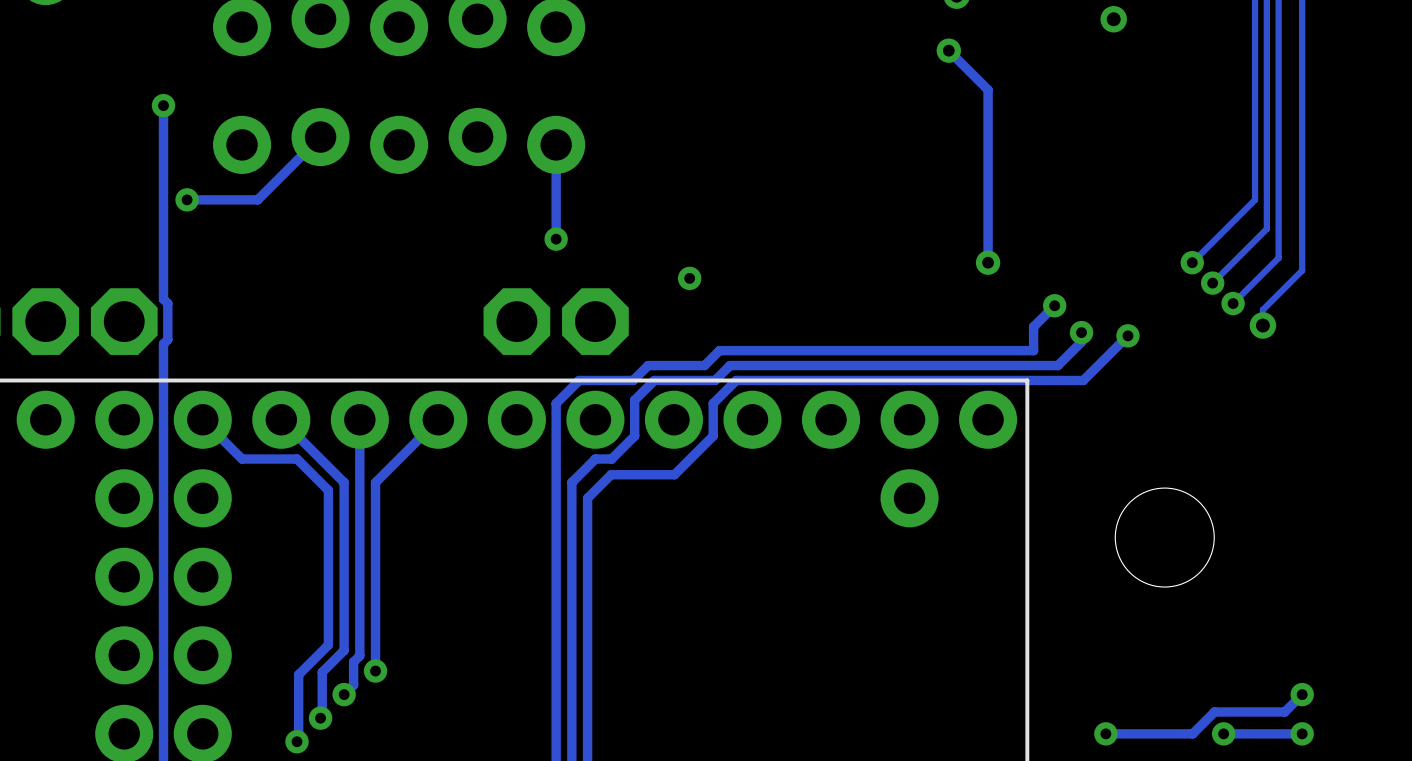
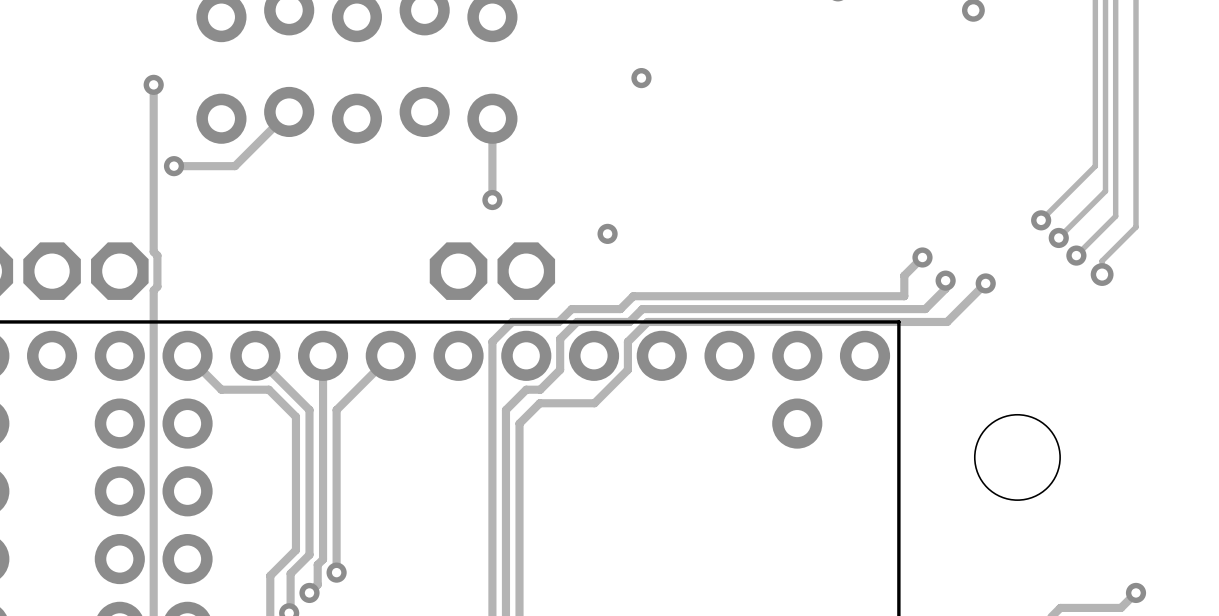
track: (948, 50) (988, 89) (988, 262) -> none
via: (948, 50) -> none
via: none -> (641, 78)
via: (988, 262) -> none

